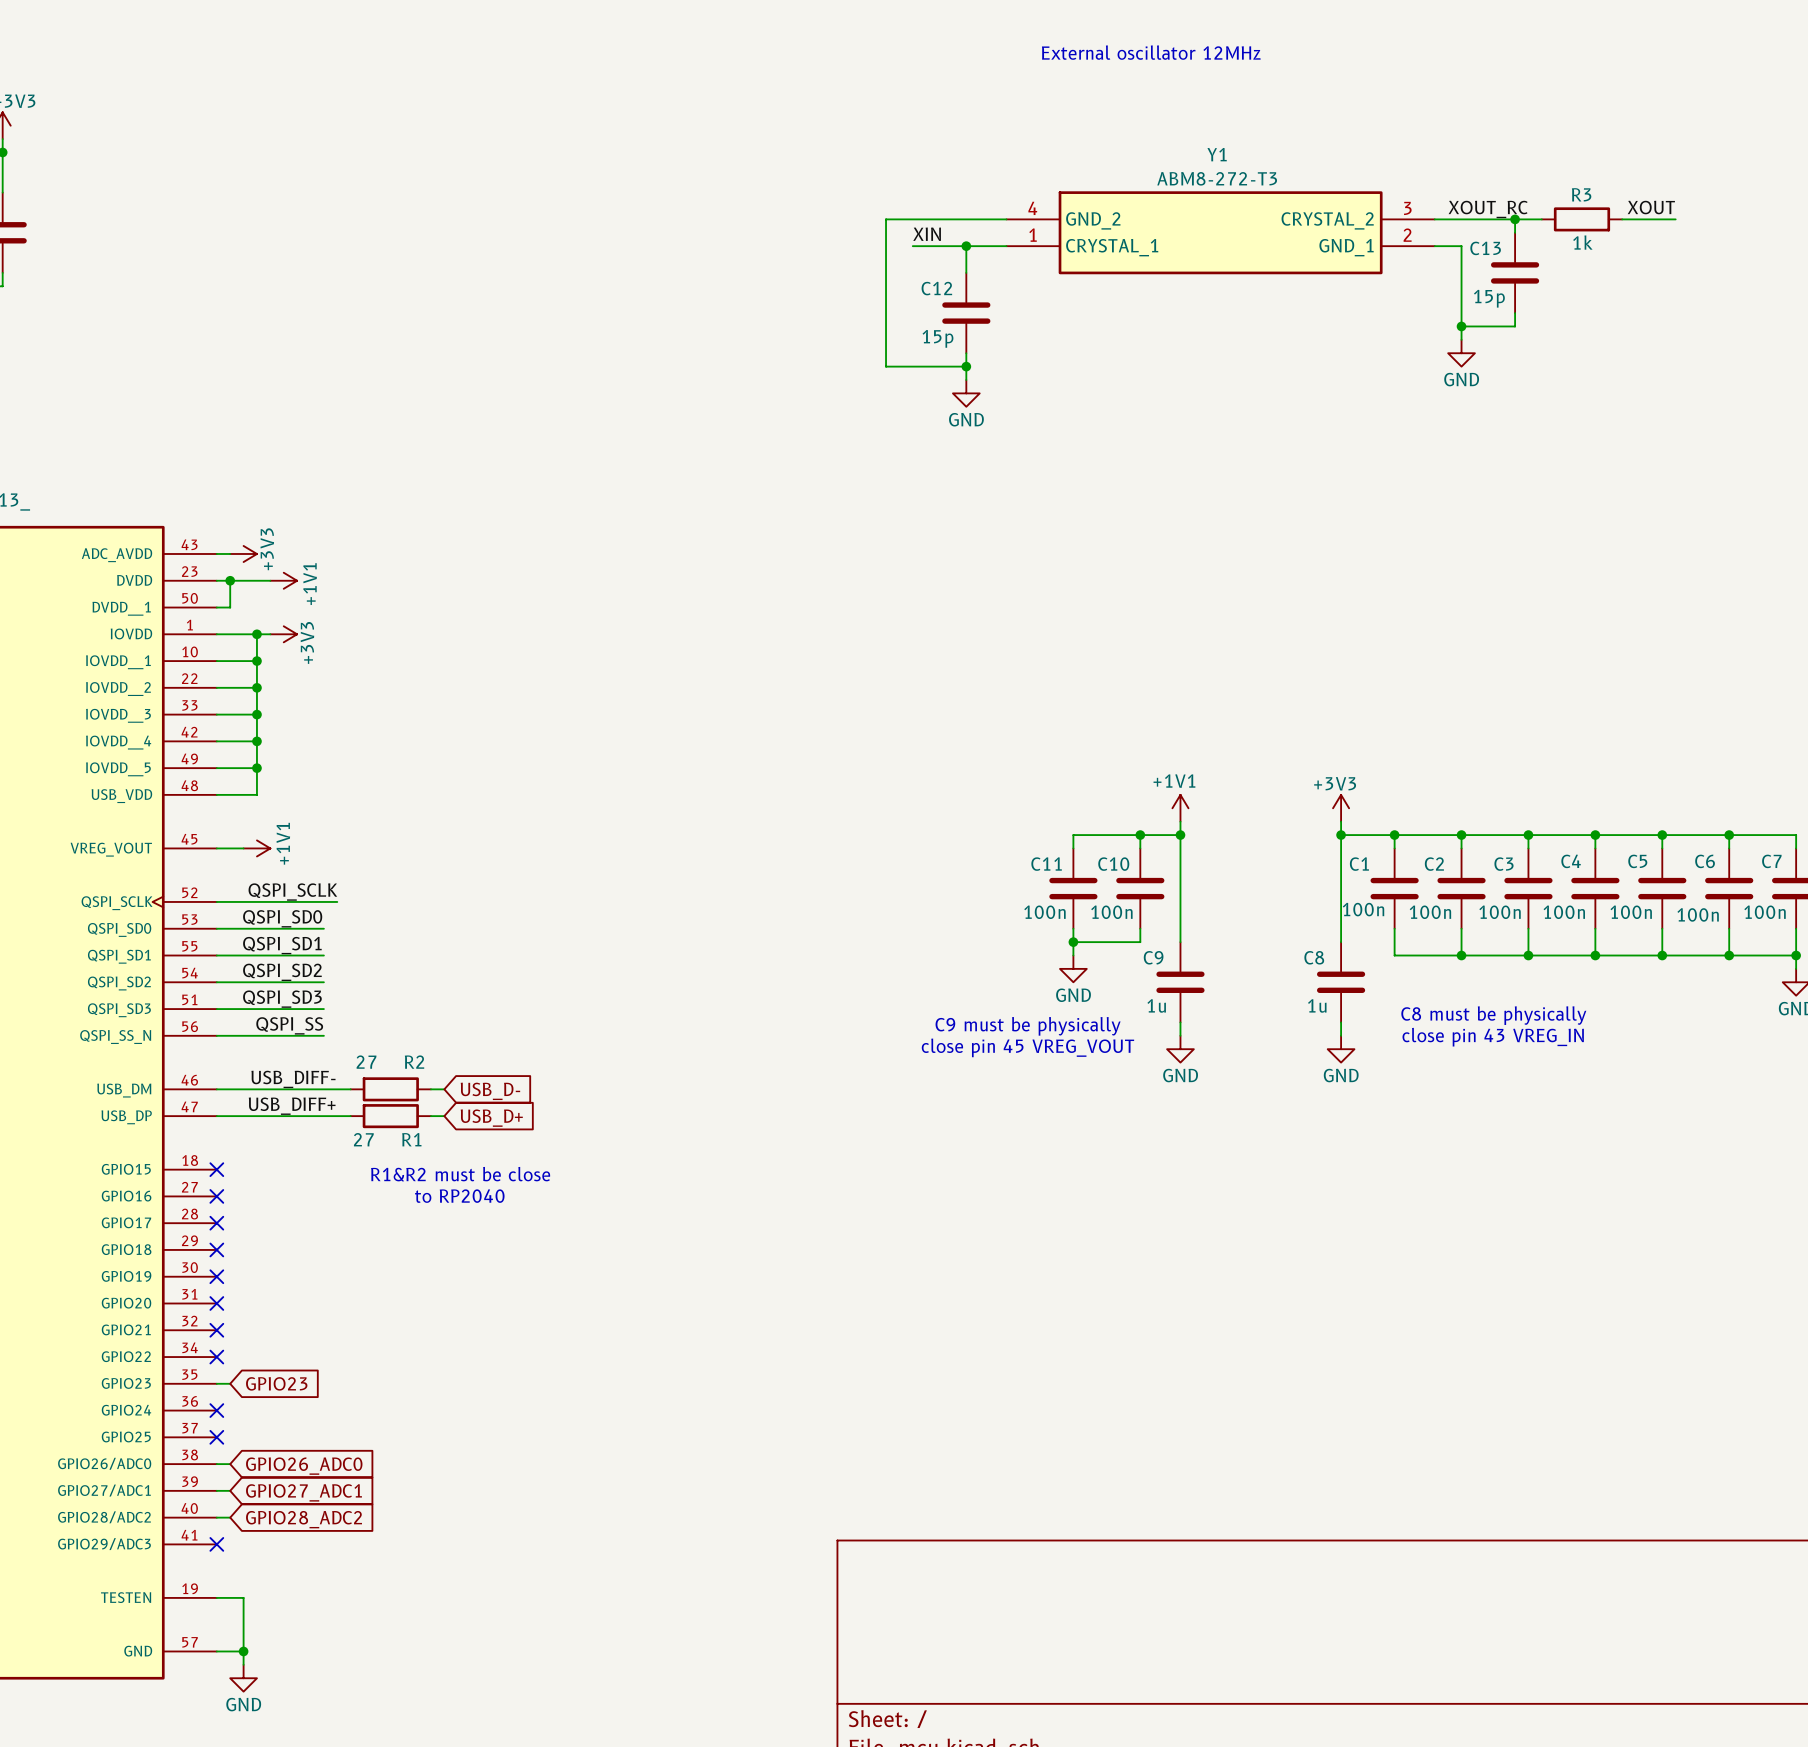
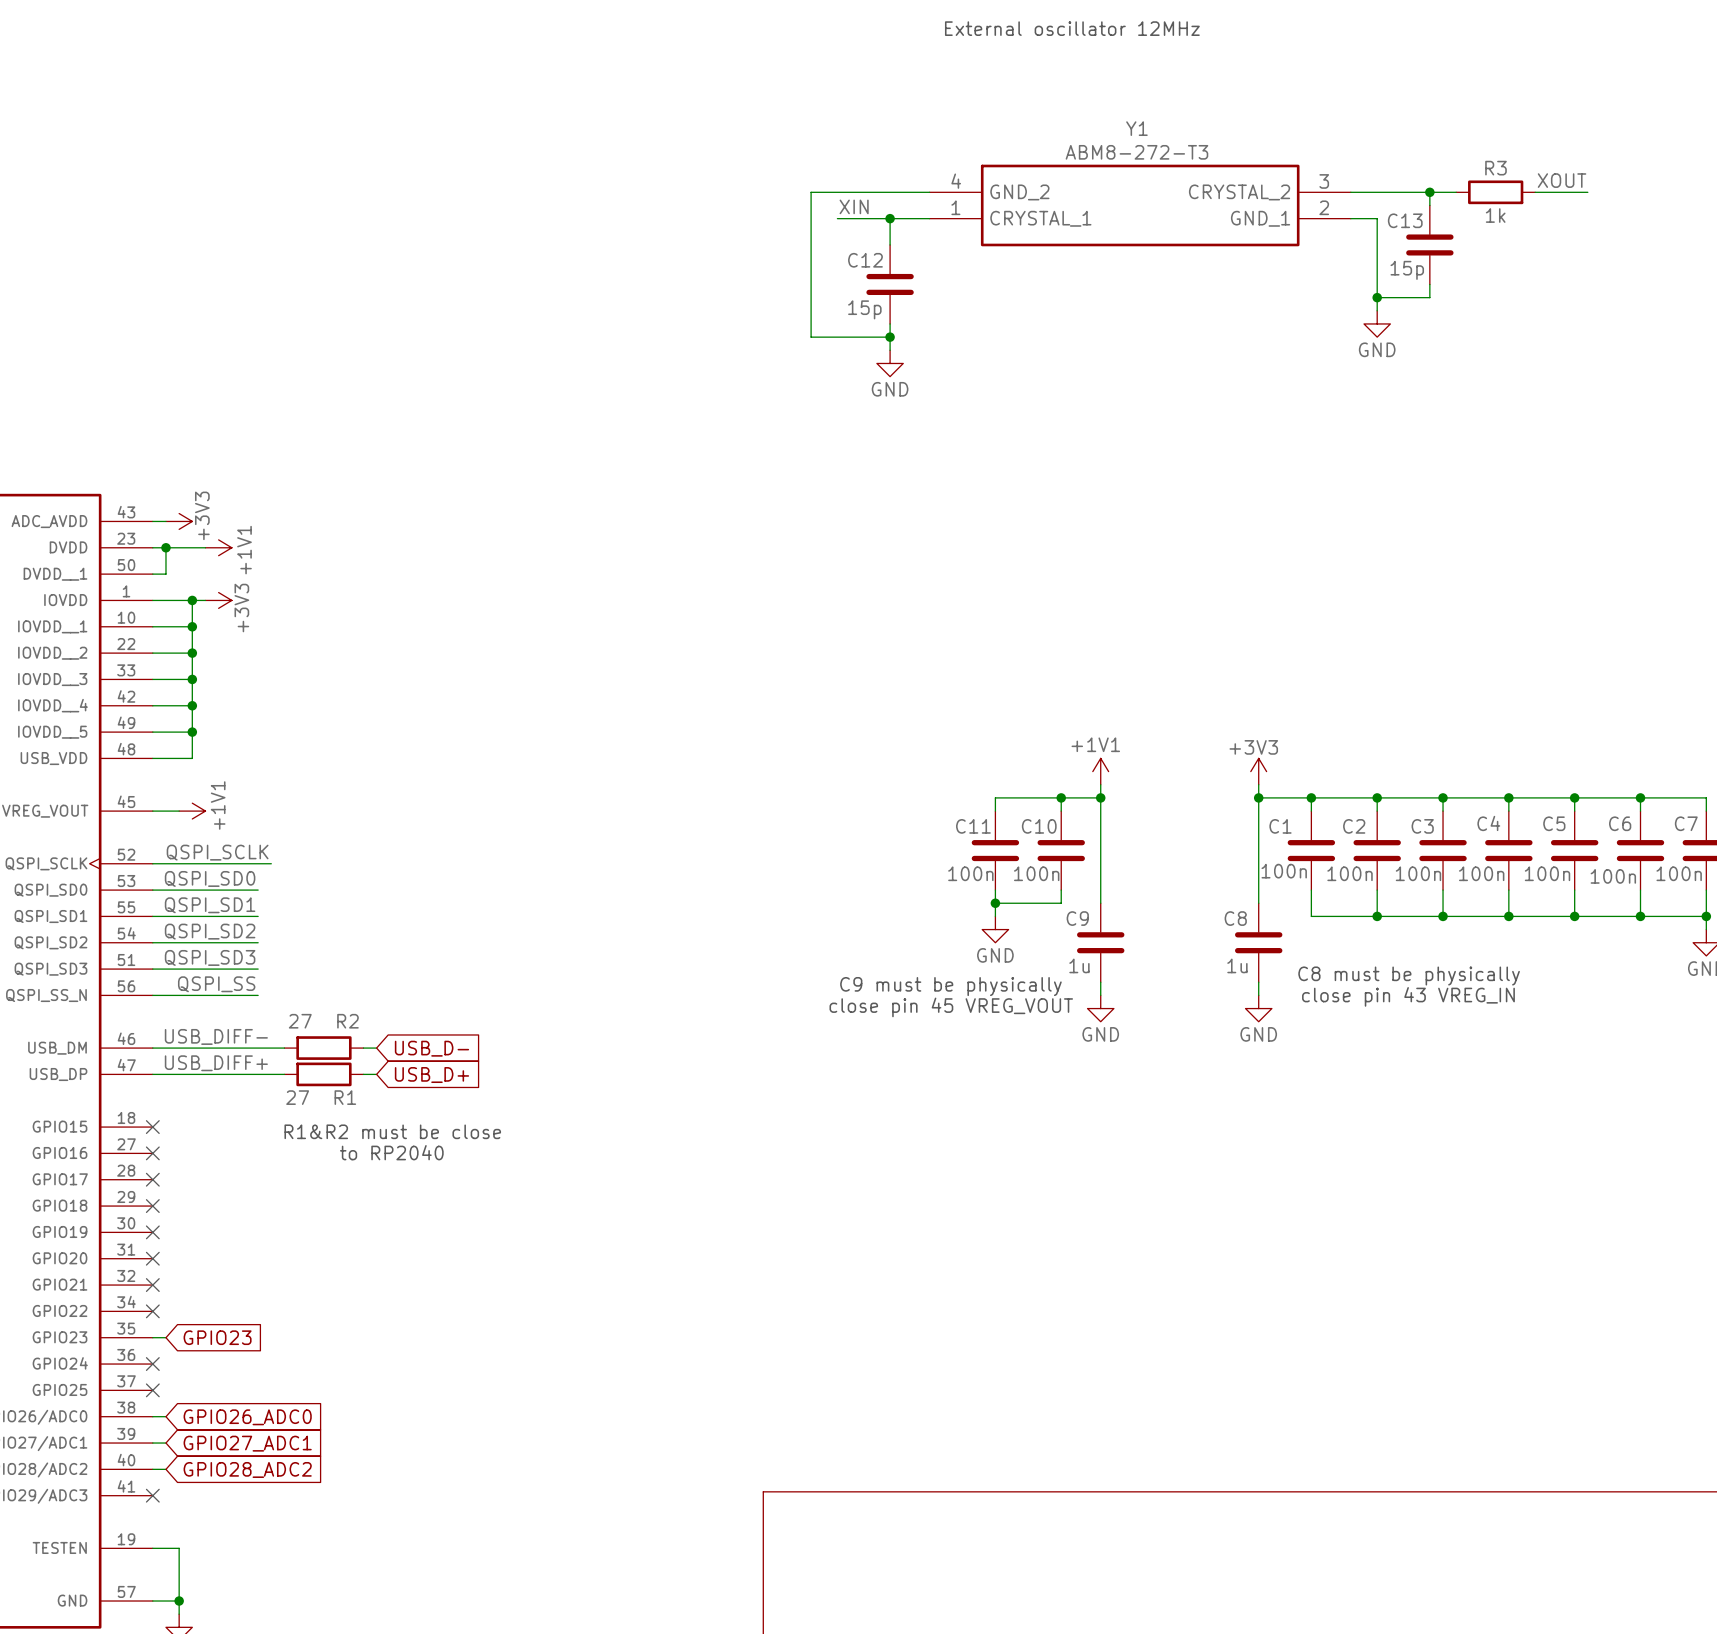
label: XOUT_RC (1488, 209) -> none

